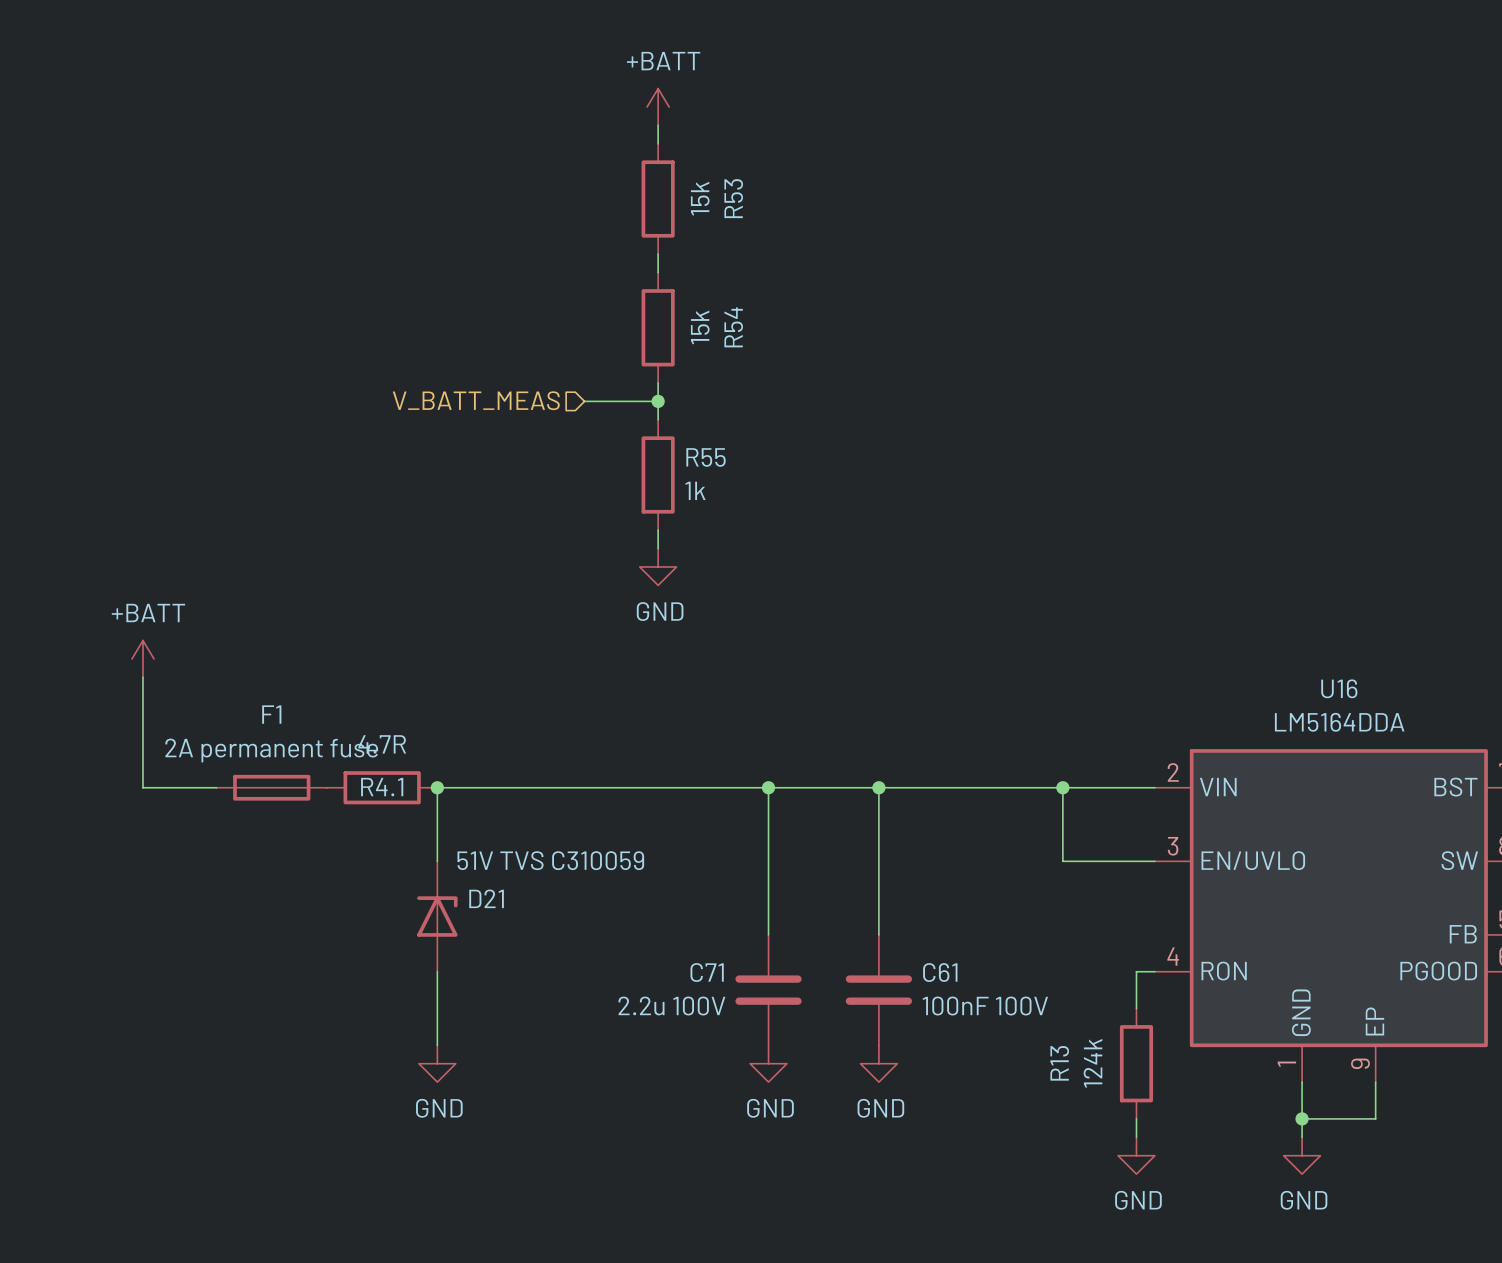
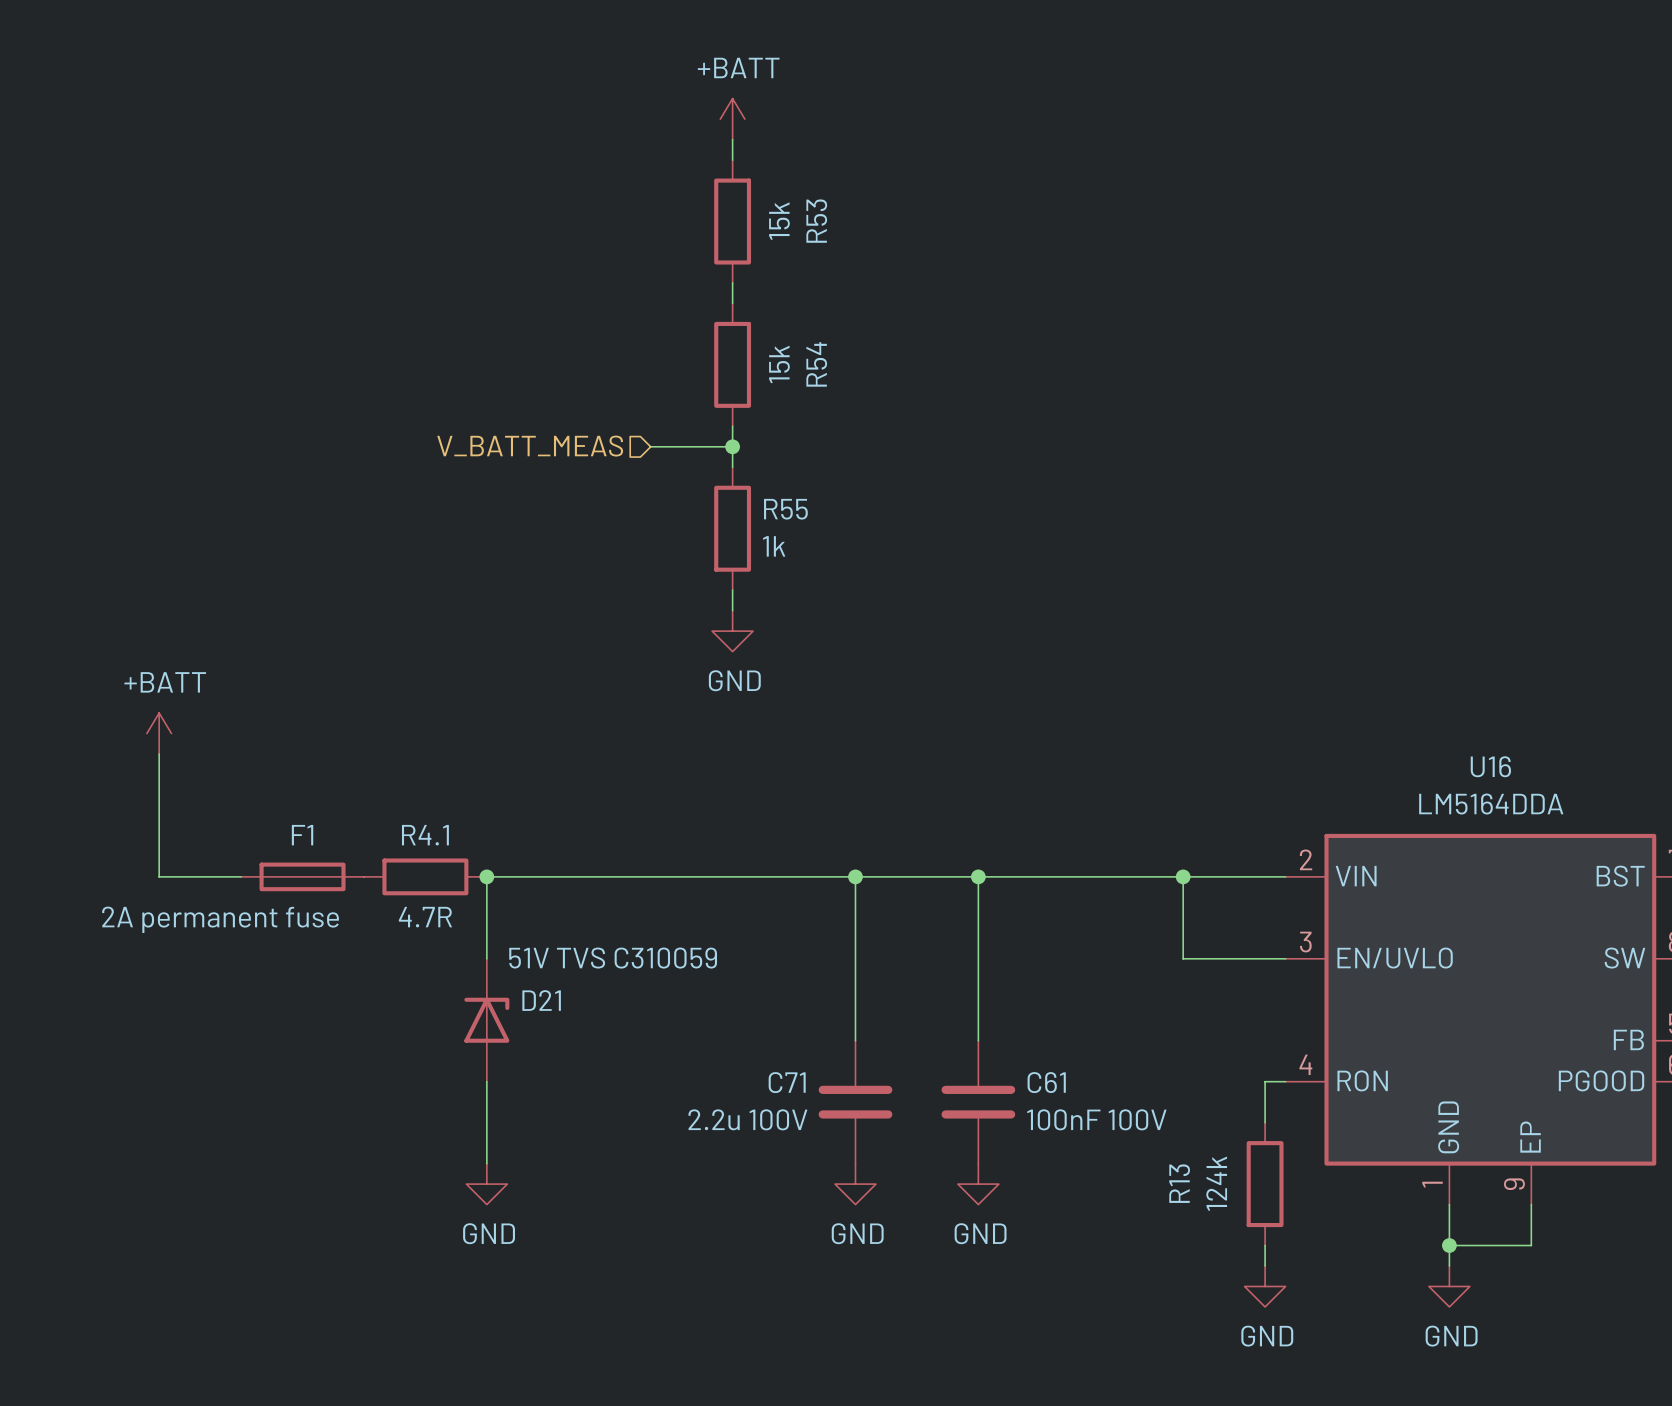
F1 name position: F1 (271, 714) -> F1 (302, 835)
R4.1 value position: 4.7R (382, 744) -> 4.7R (425, 917)
F1 value position: 2A permanent fuse (271, 750) -> 2A permanent fuse (220, 919)
R4.1 name position: R4.1 (382, 787) -> R4.1 (425, 835)

